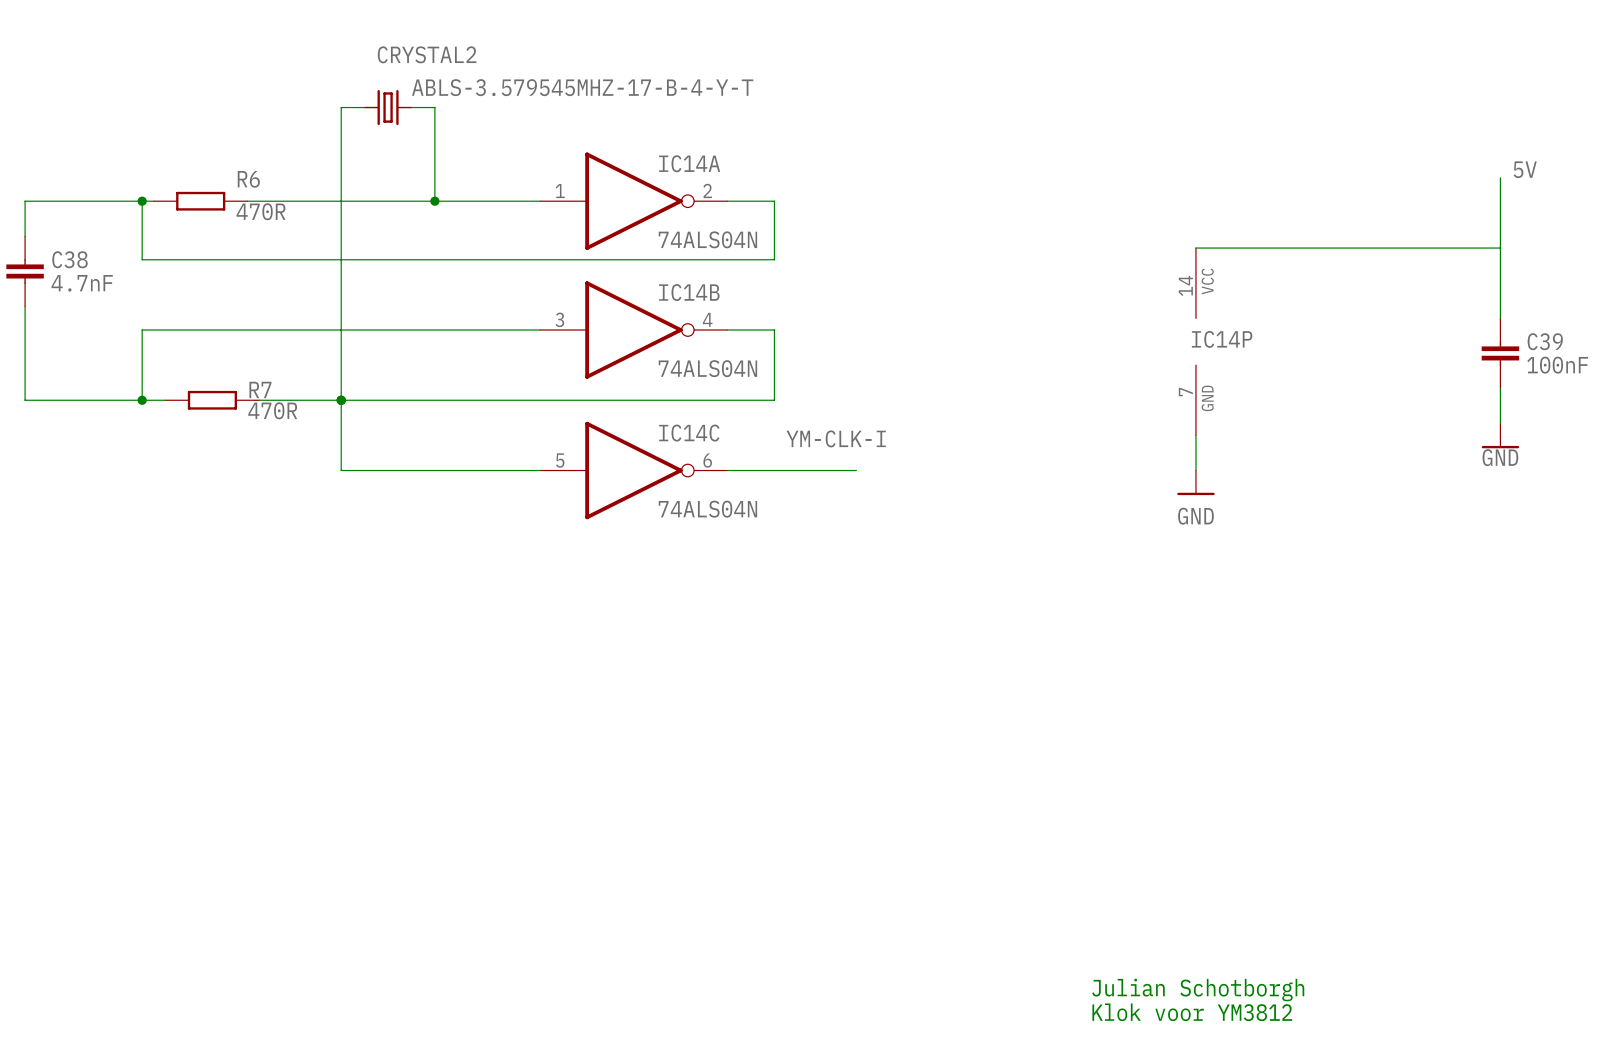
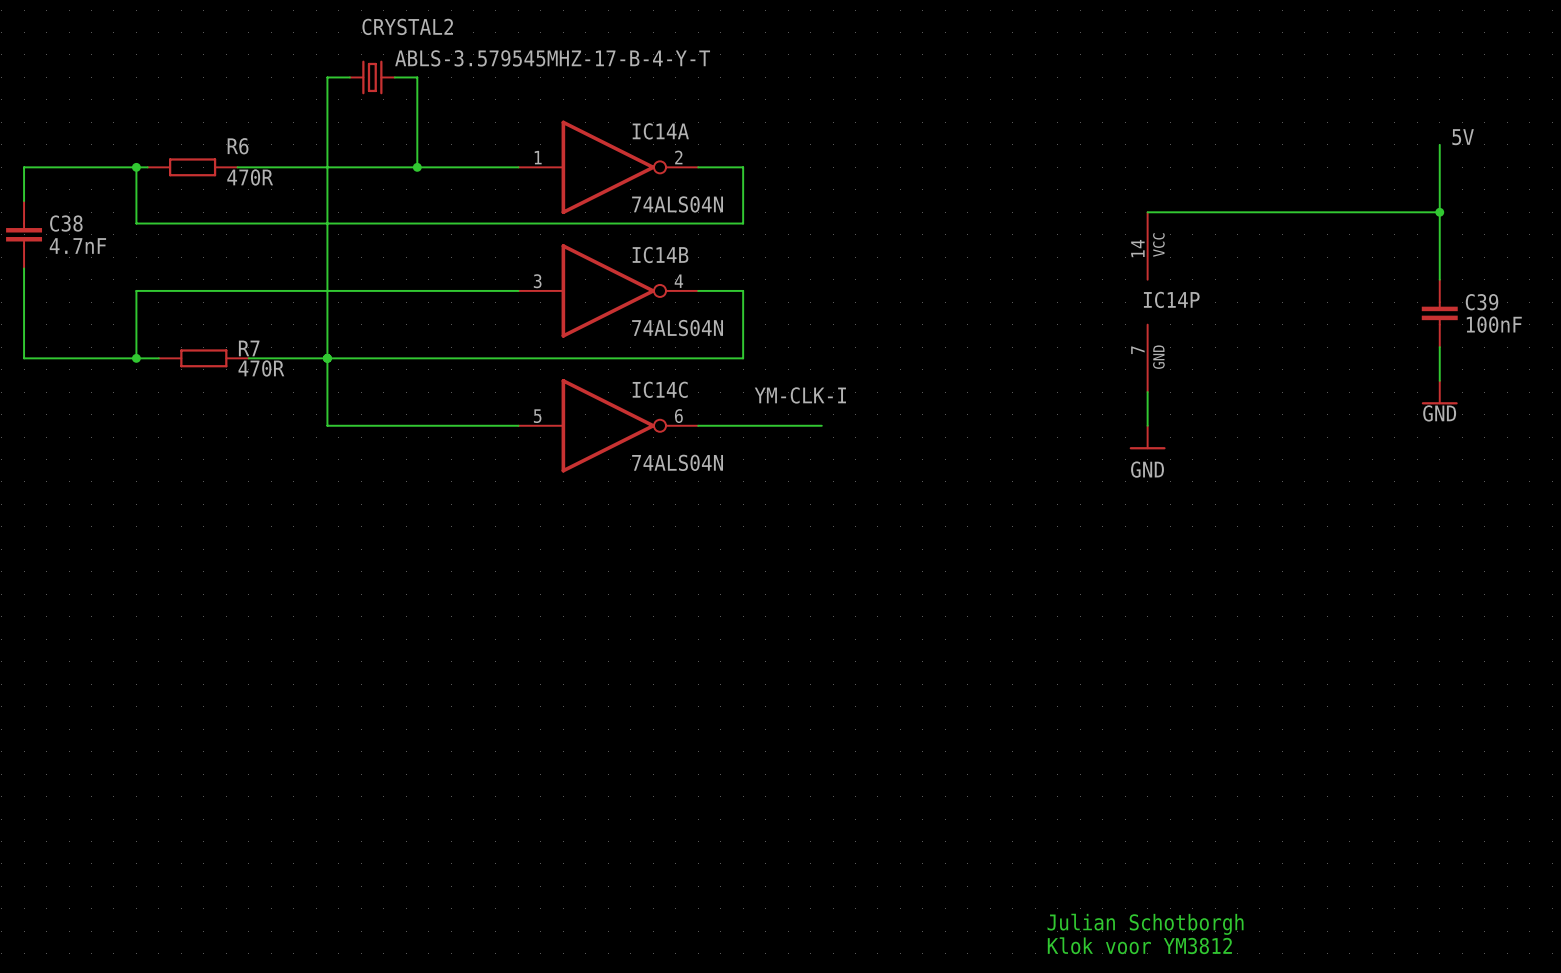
junction: none -> (1439, 212)

